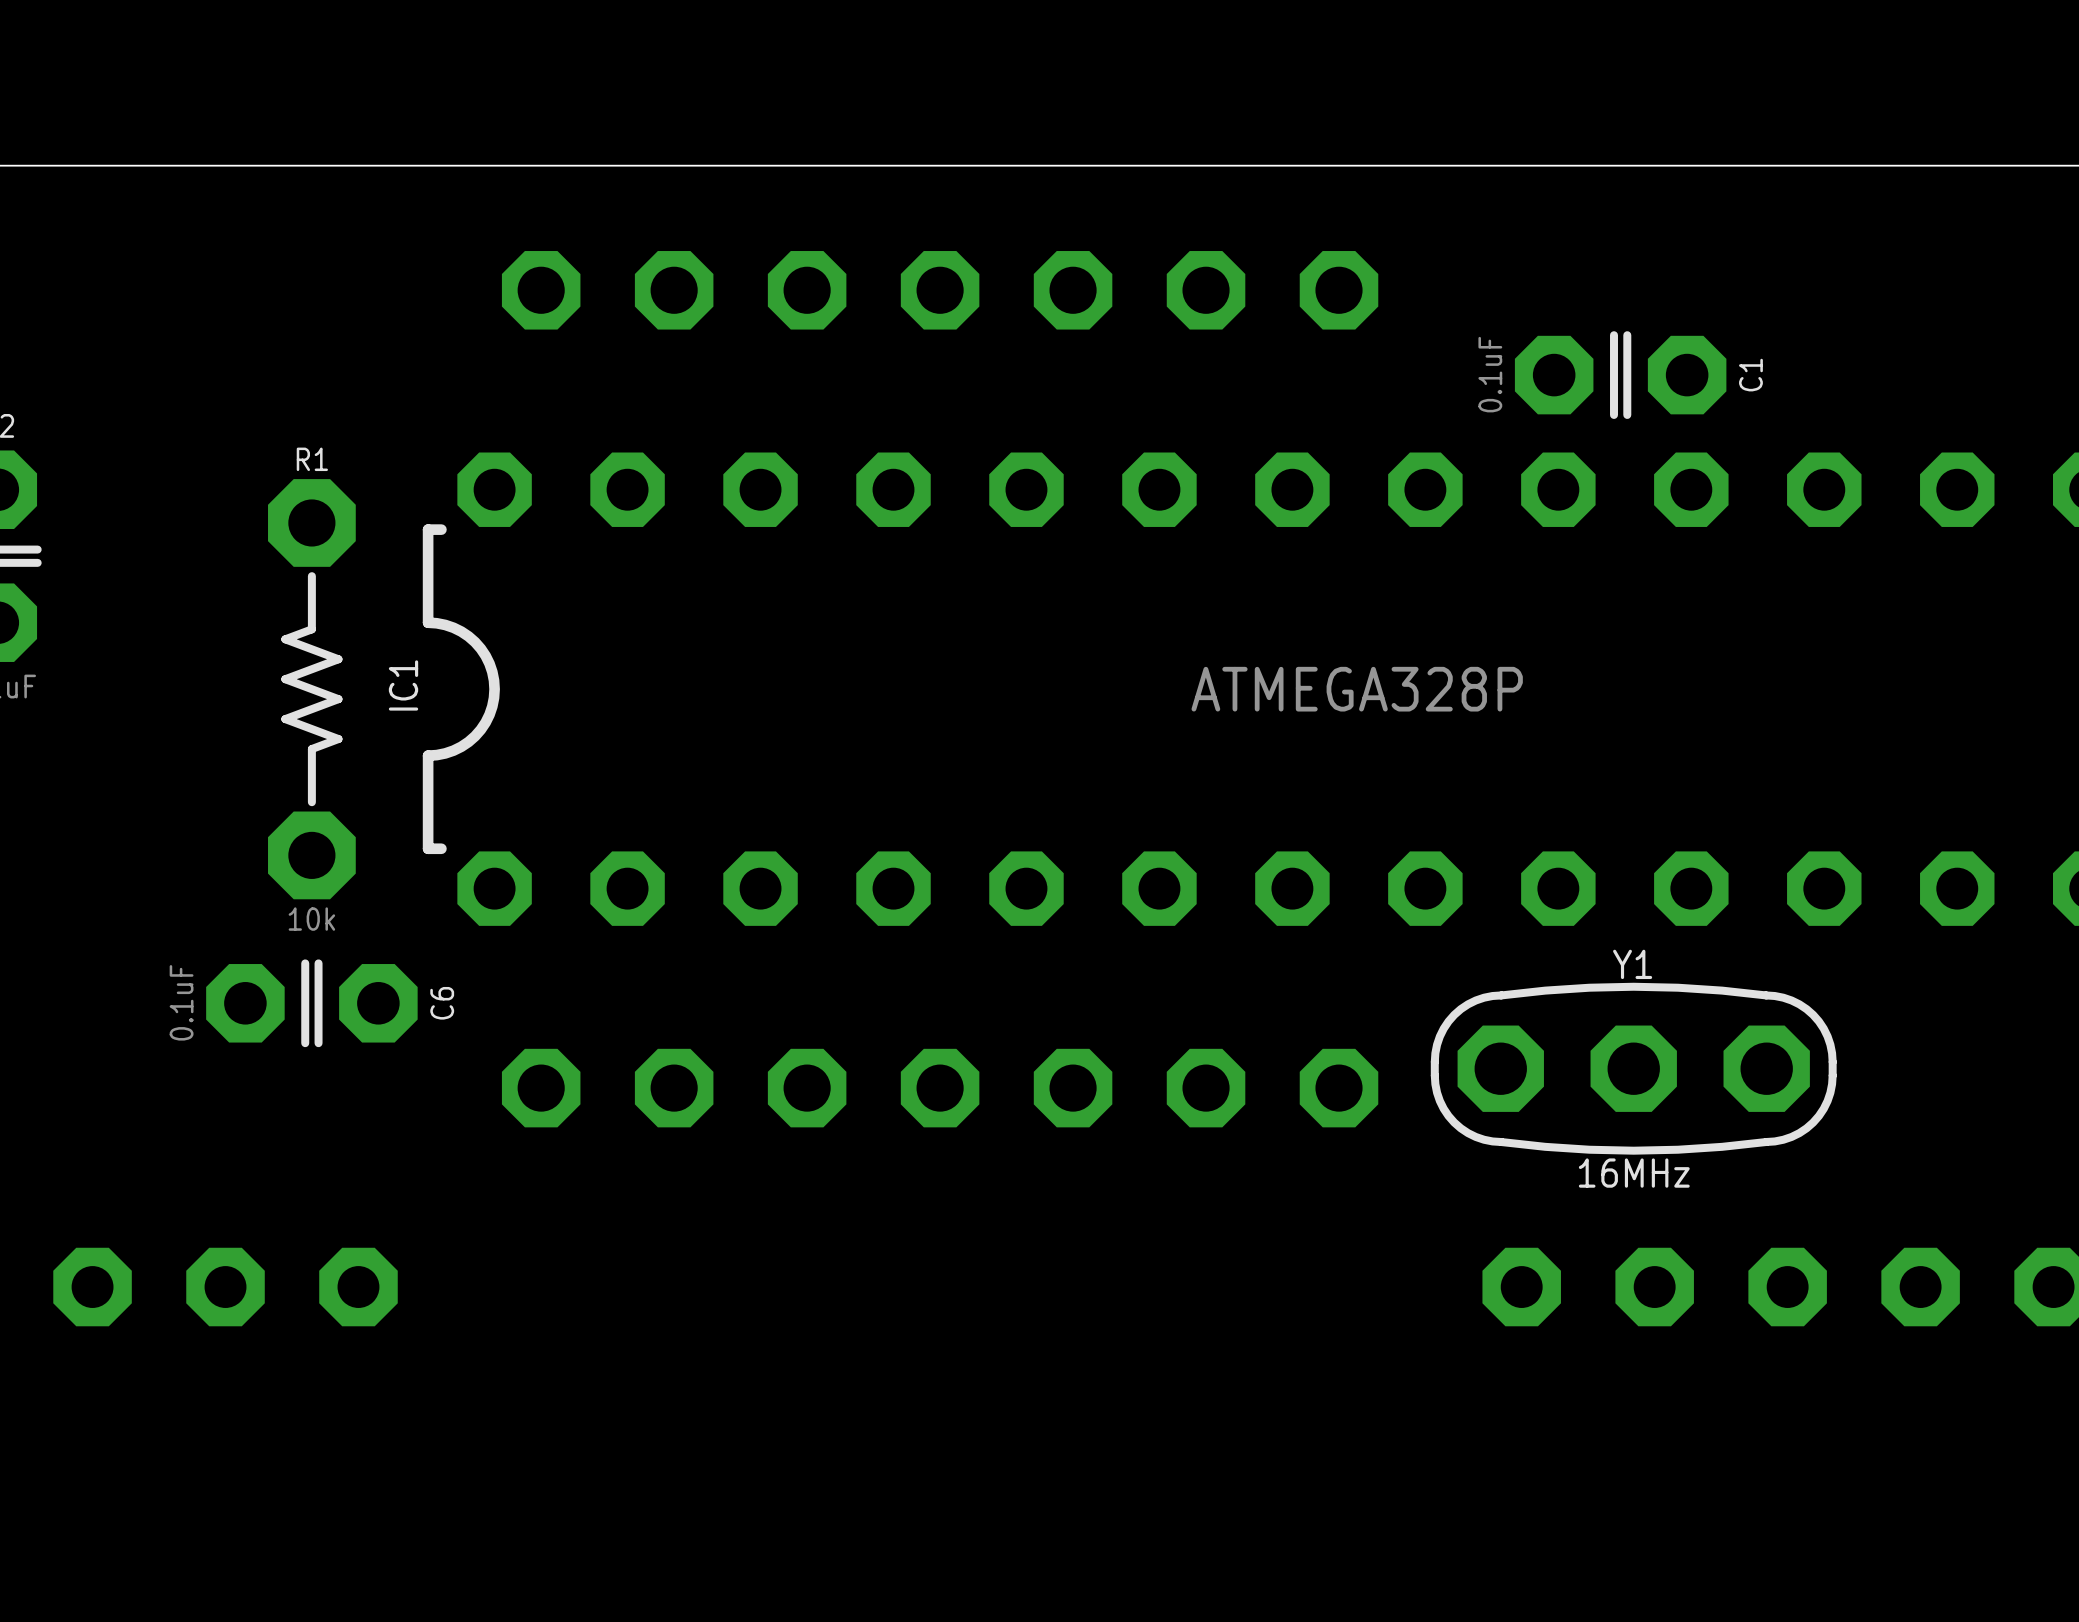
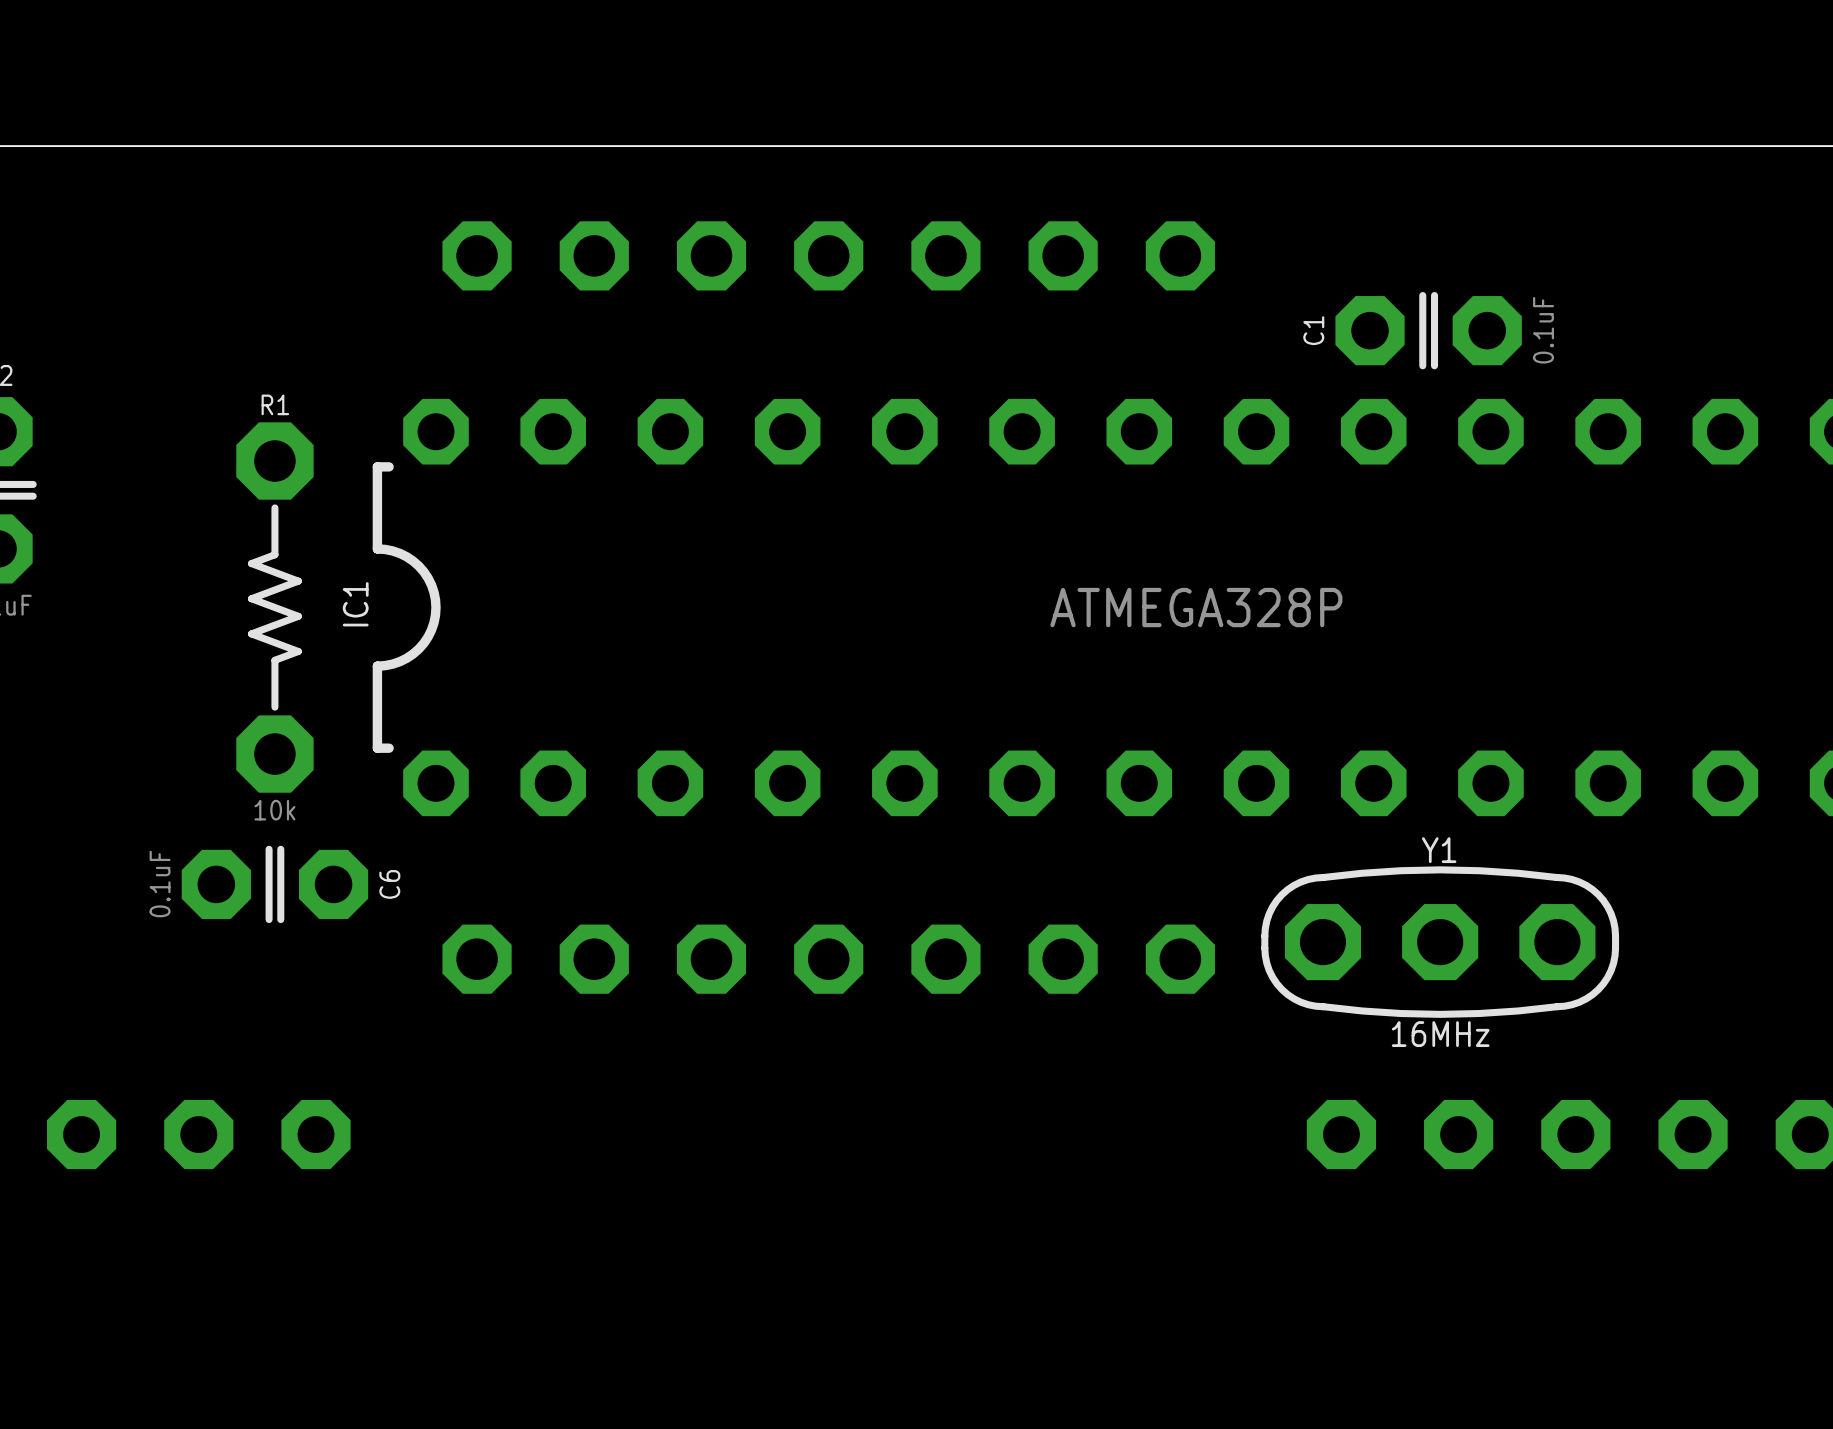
C1 value position: 0.1uF (1490, 374) -> 0.1uF (1543, 330)
C1 name position: C1 (1750, 375) -> C1 (1313, 330)

